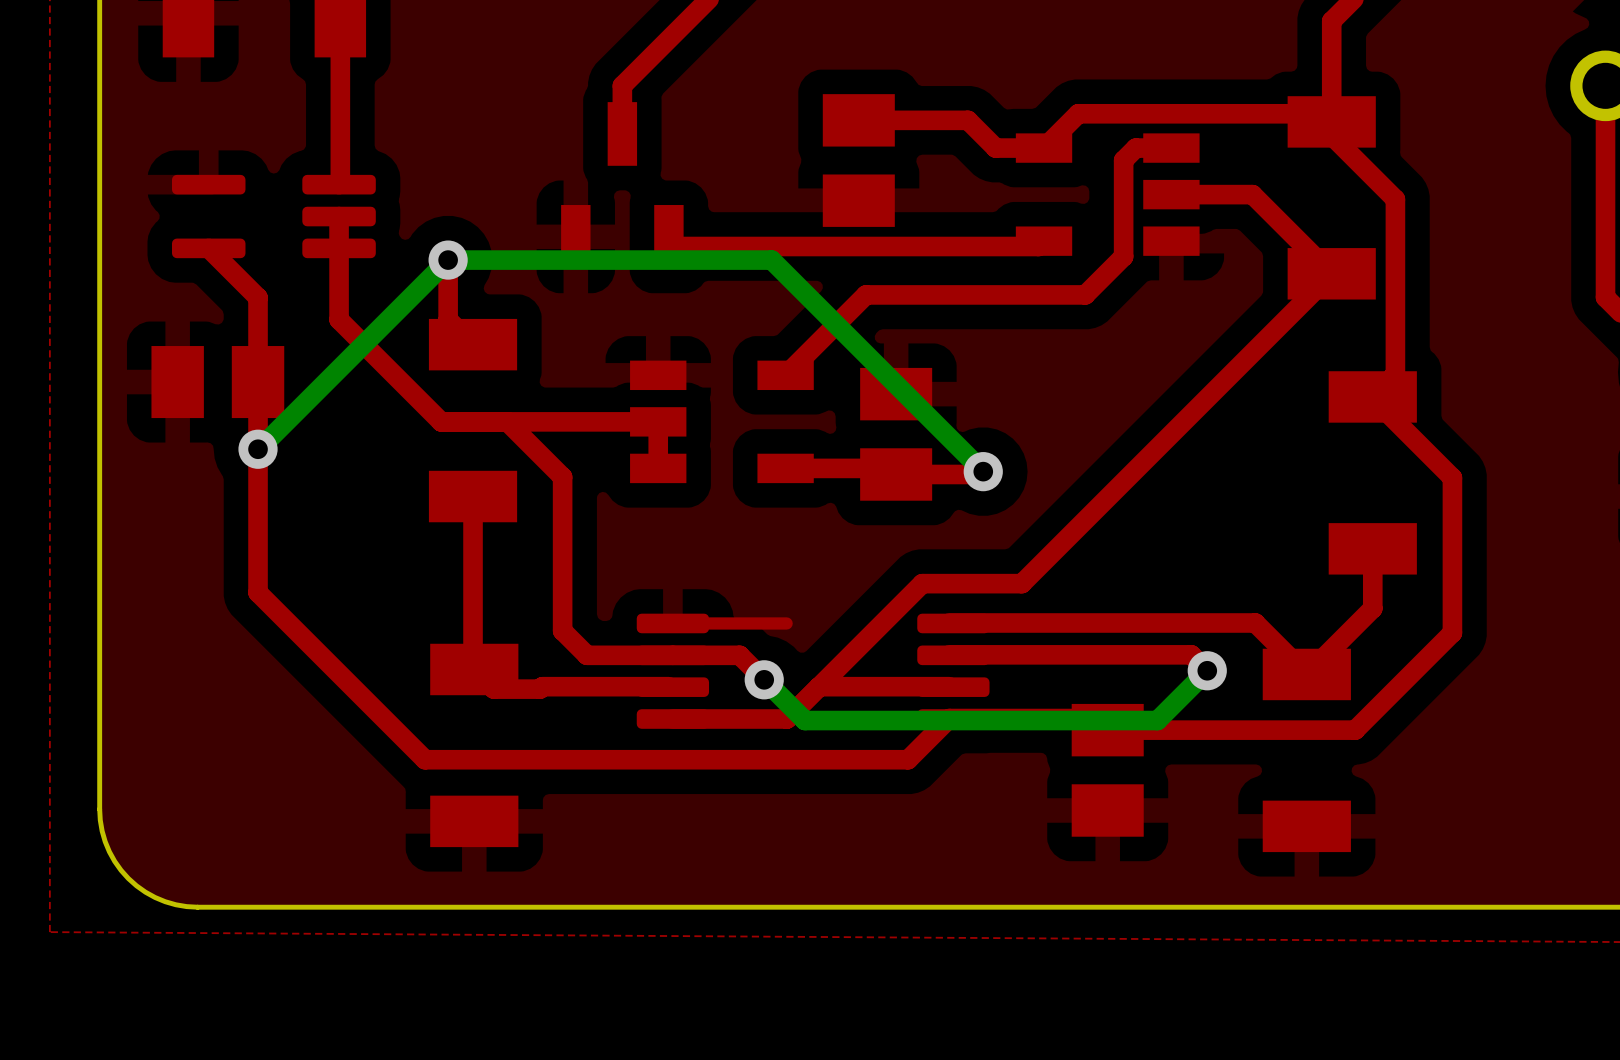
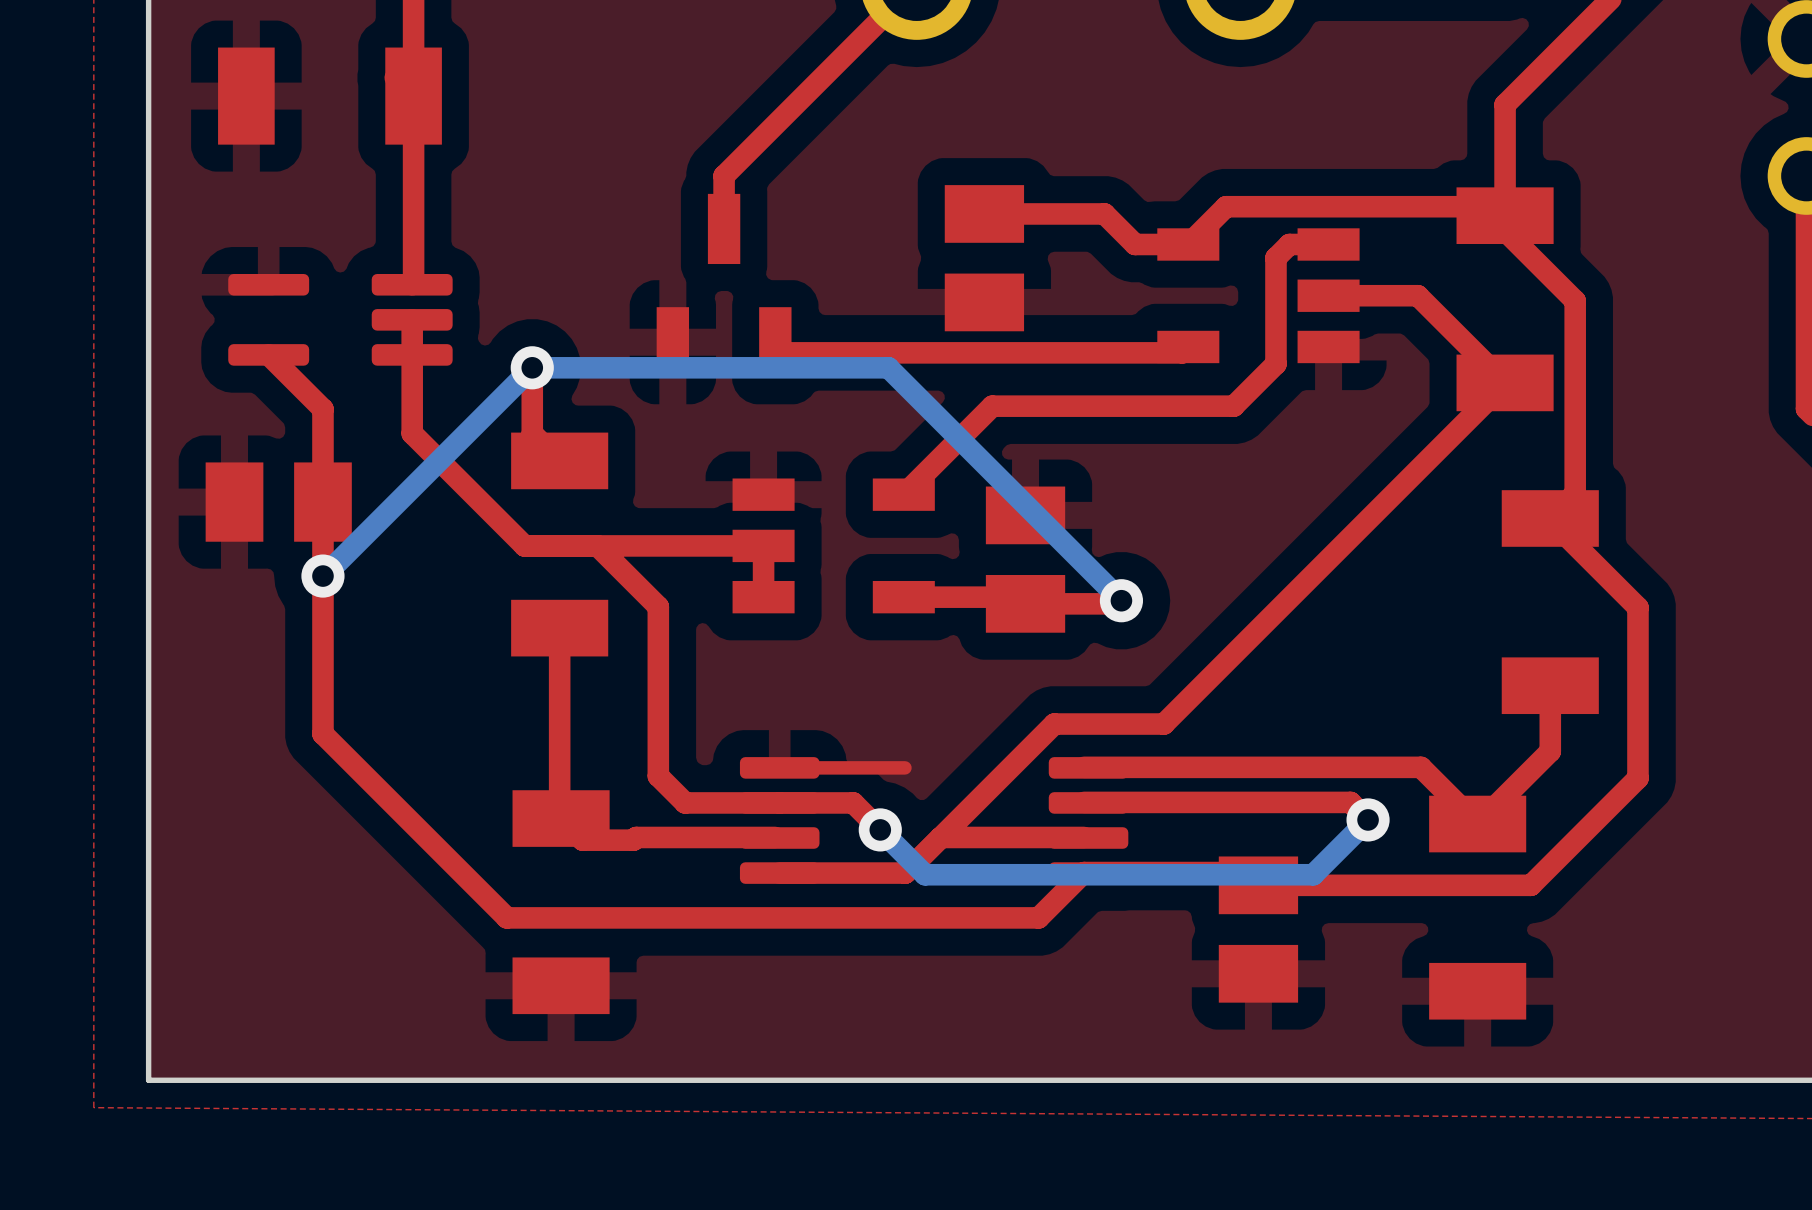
board edge: (99, 809) (102, 831) (109, 851) (128, 878) (145, 892) (165, 901) (197, 907) -> (148, 972) (148, 1080) (256, 1080)

